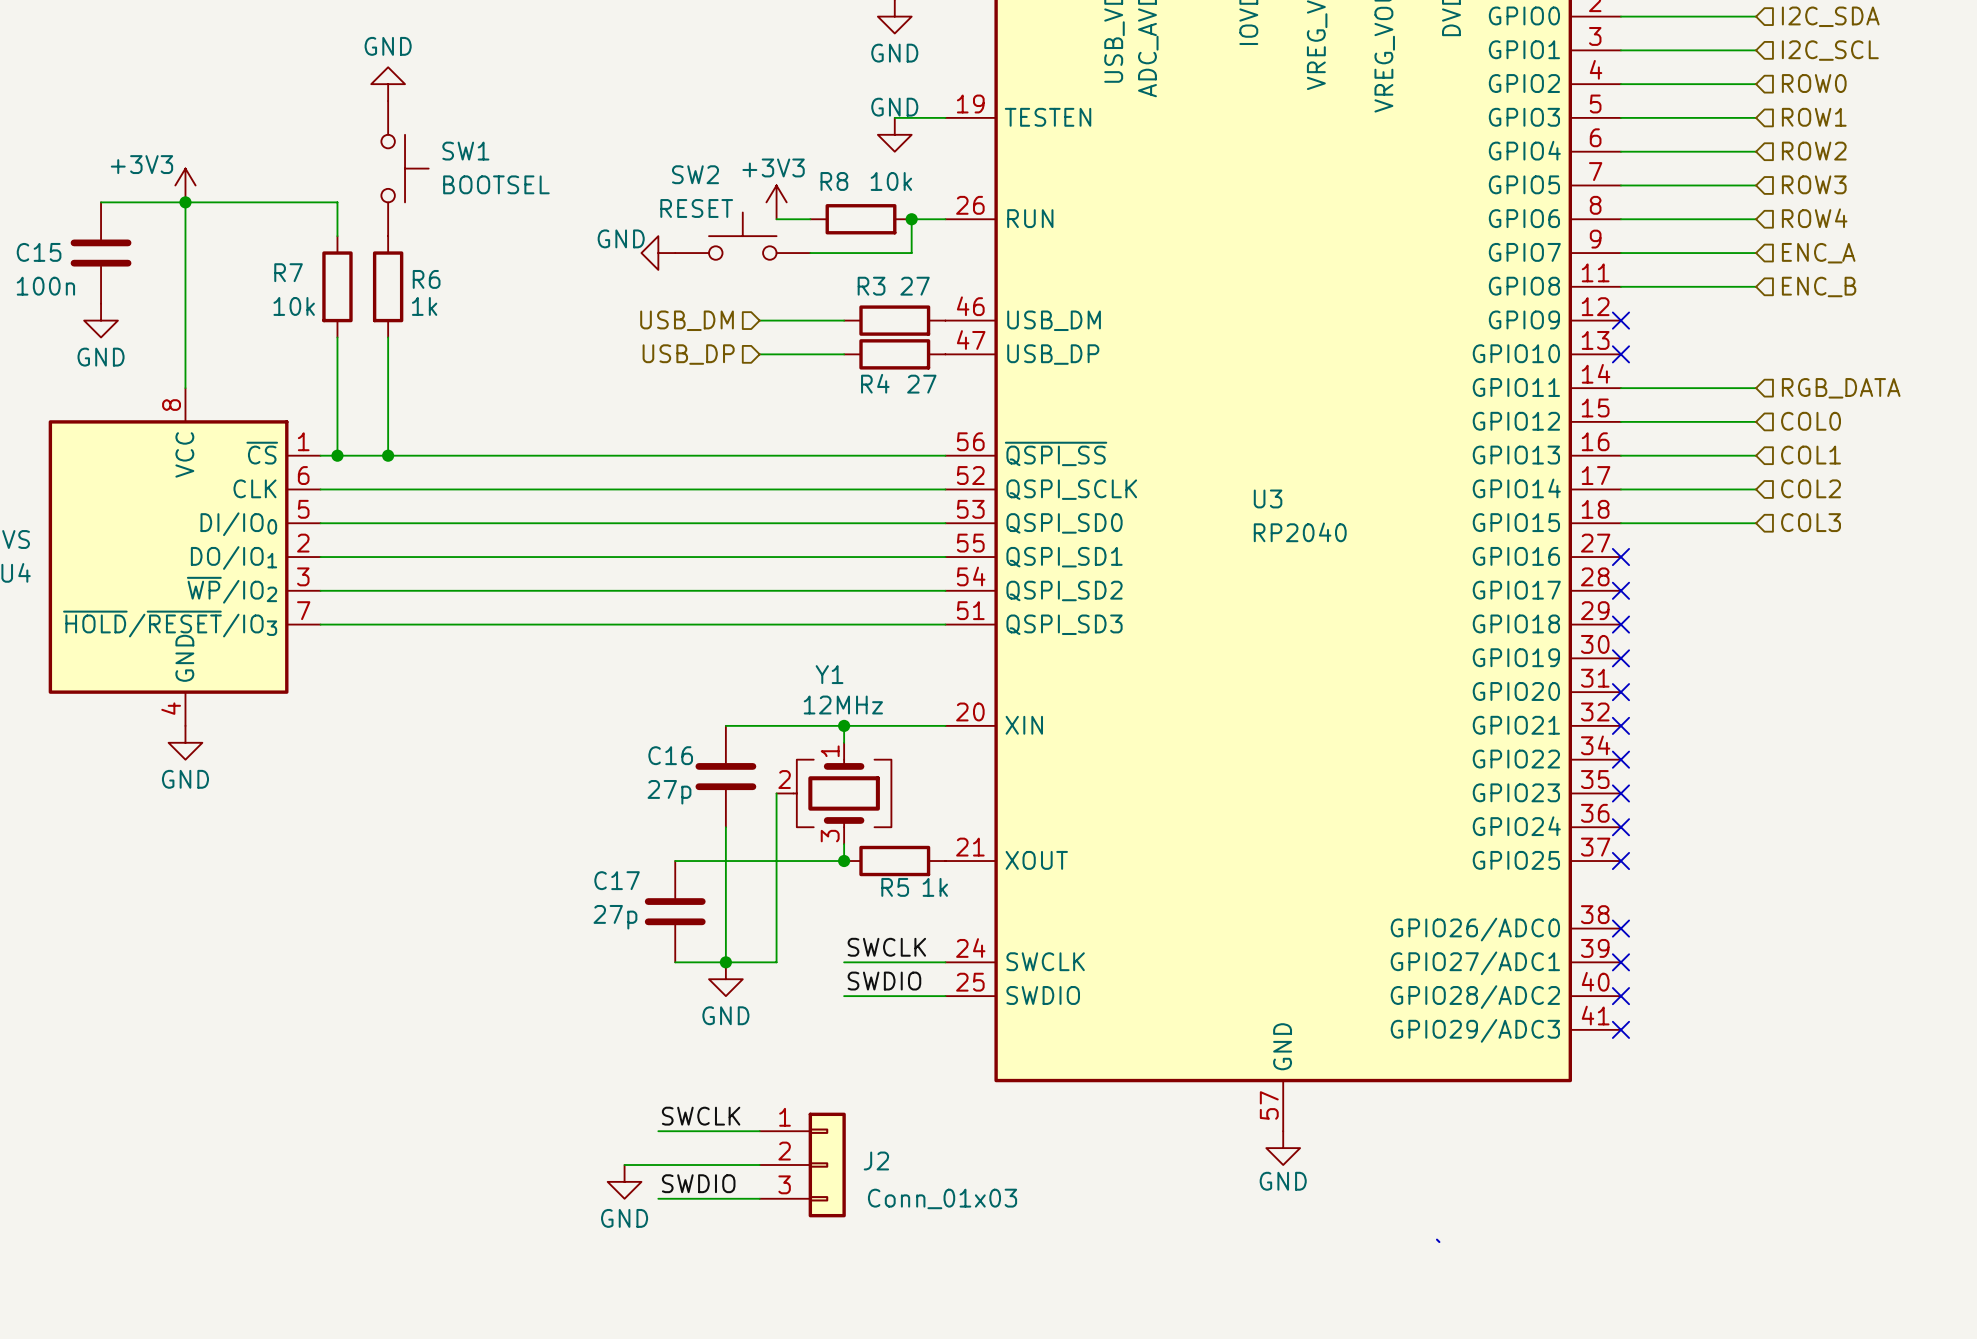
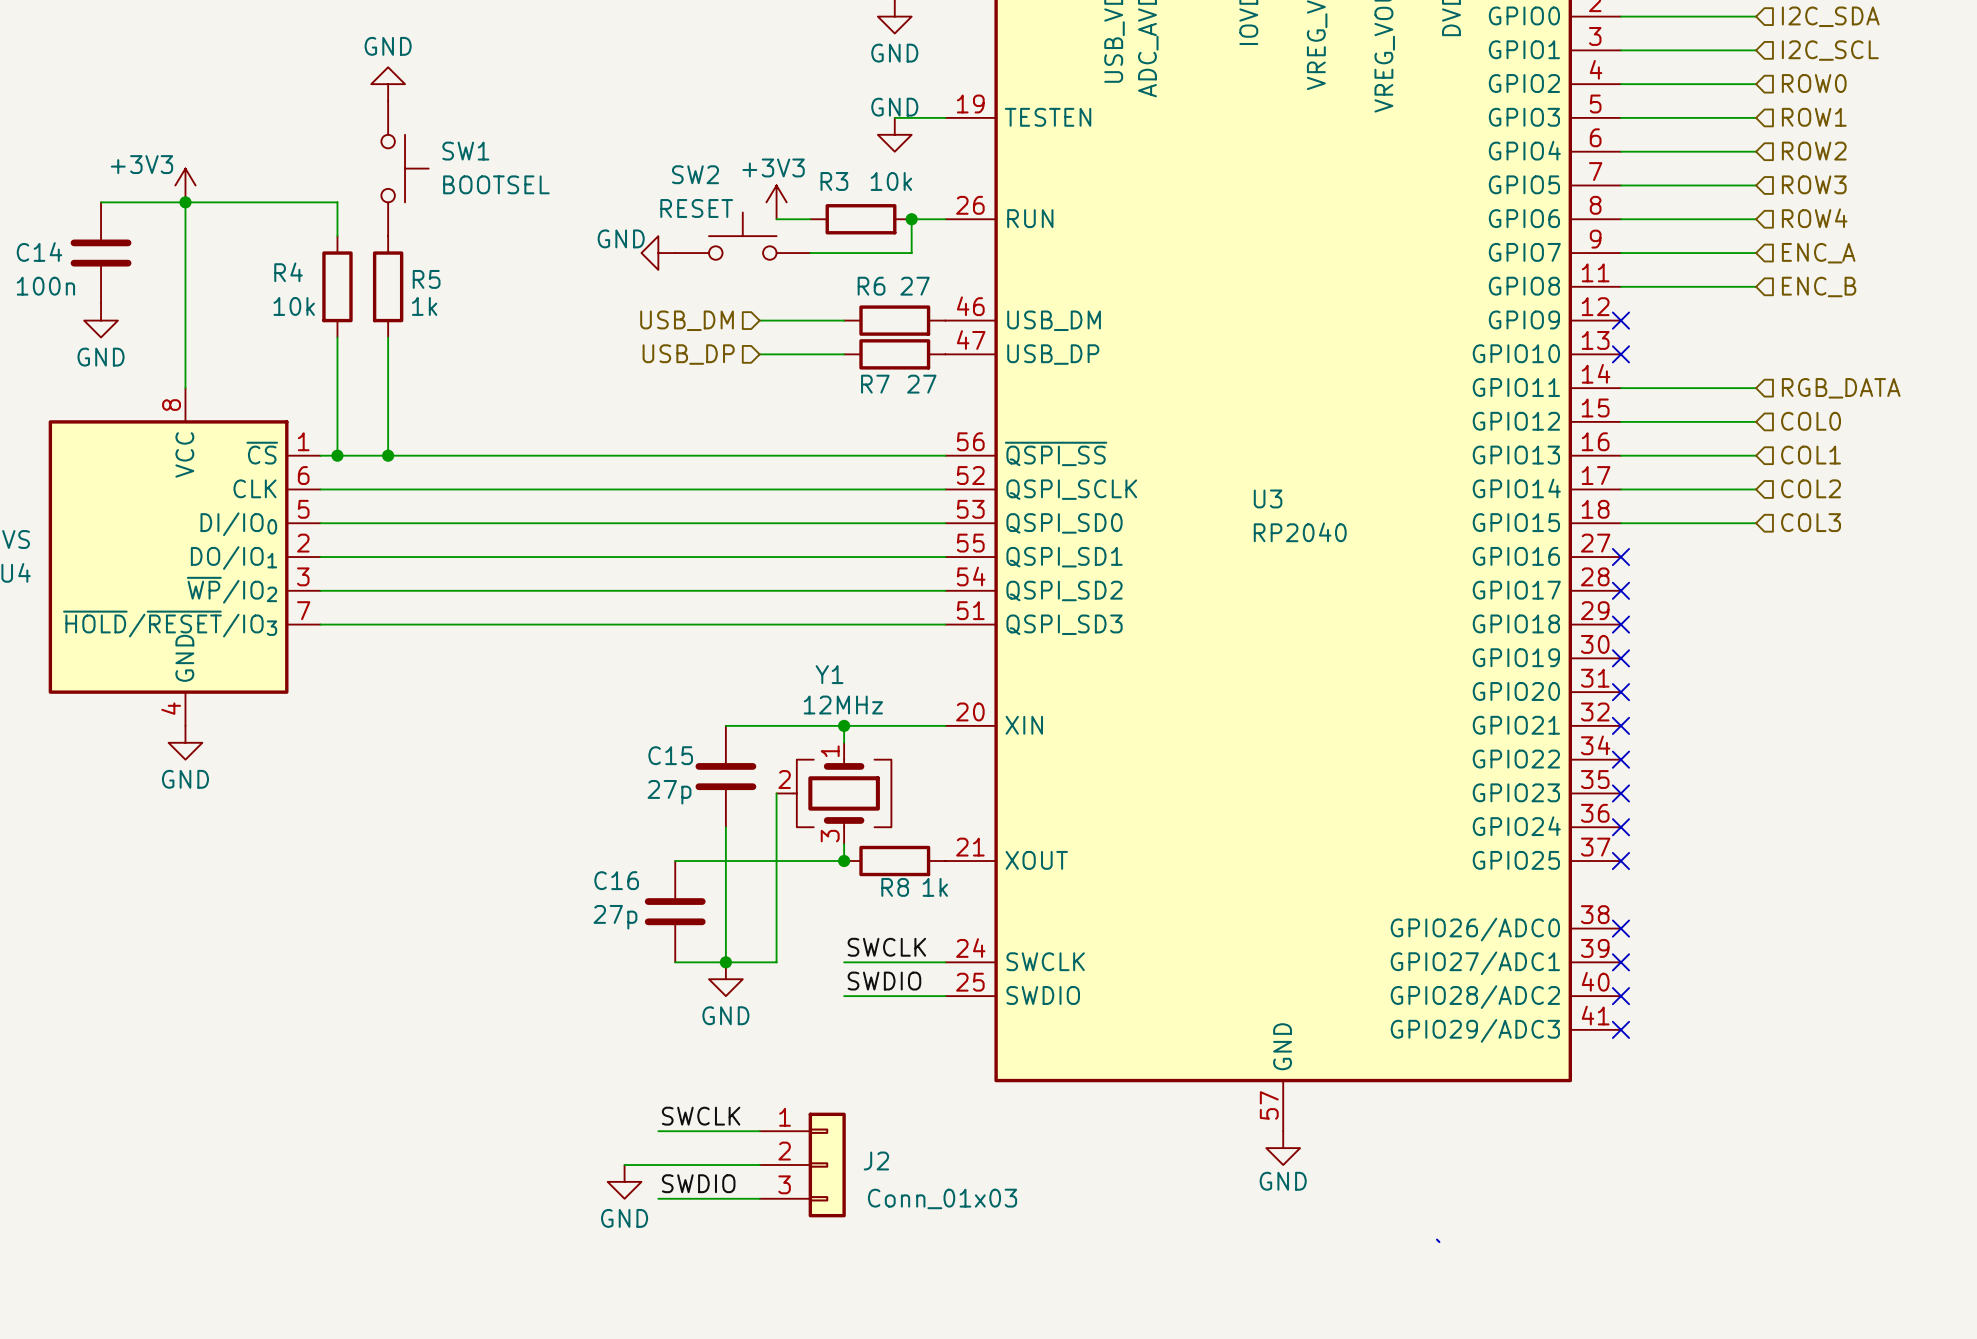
R8 name: R8 (834, 181) -> R3 (834, 181)
C15 name: C15 (39, 252) -> C14 (39, 252)
R7 name: R7 (288, 272) -> R4 (288, 272)
R6 name: R6 (426, 279) -> R5 (426, 279)
R3 name: R3 (871, 286) -> R6 (871, 286)
R4 name: R4 (875, 383) -> R7 (875, 384)
C16 name: C16 (670, 755) -> C15 (670, 755)
C17 name: C17 (617, 880) -> C16 (616, 880)
R5 name: R5 (895, 887) -> R8 (895, 887)

